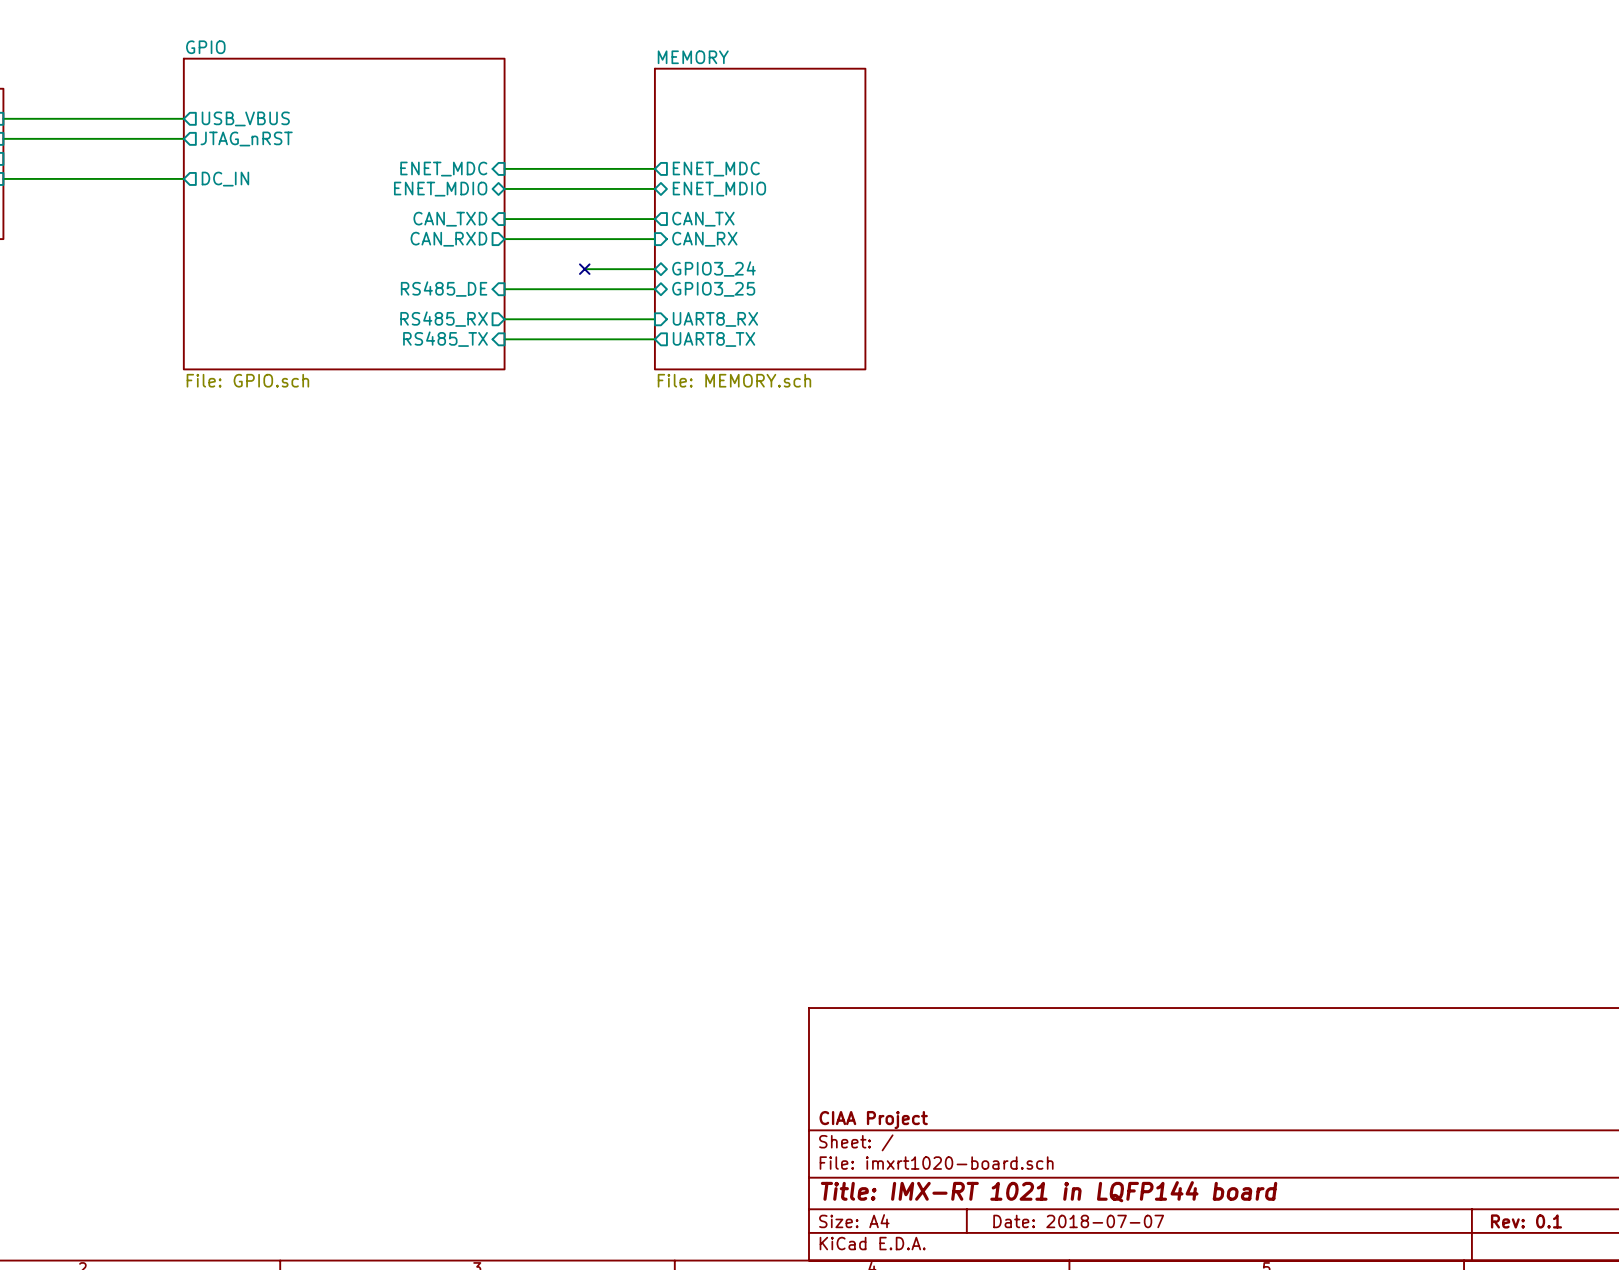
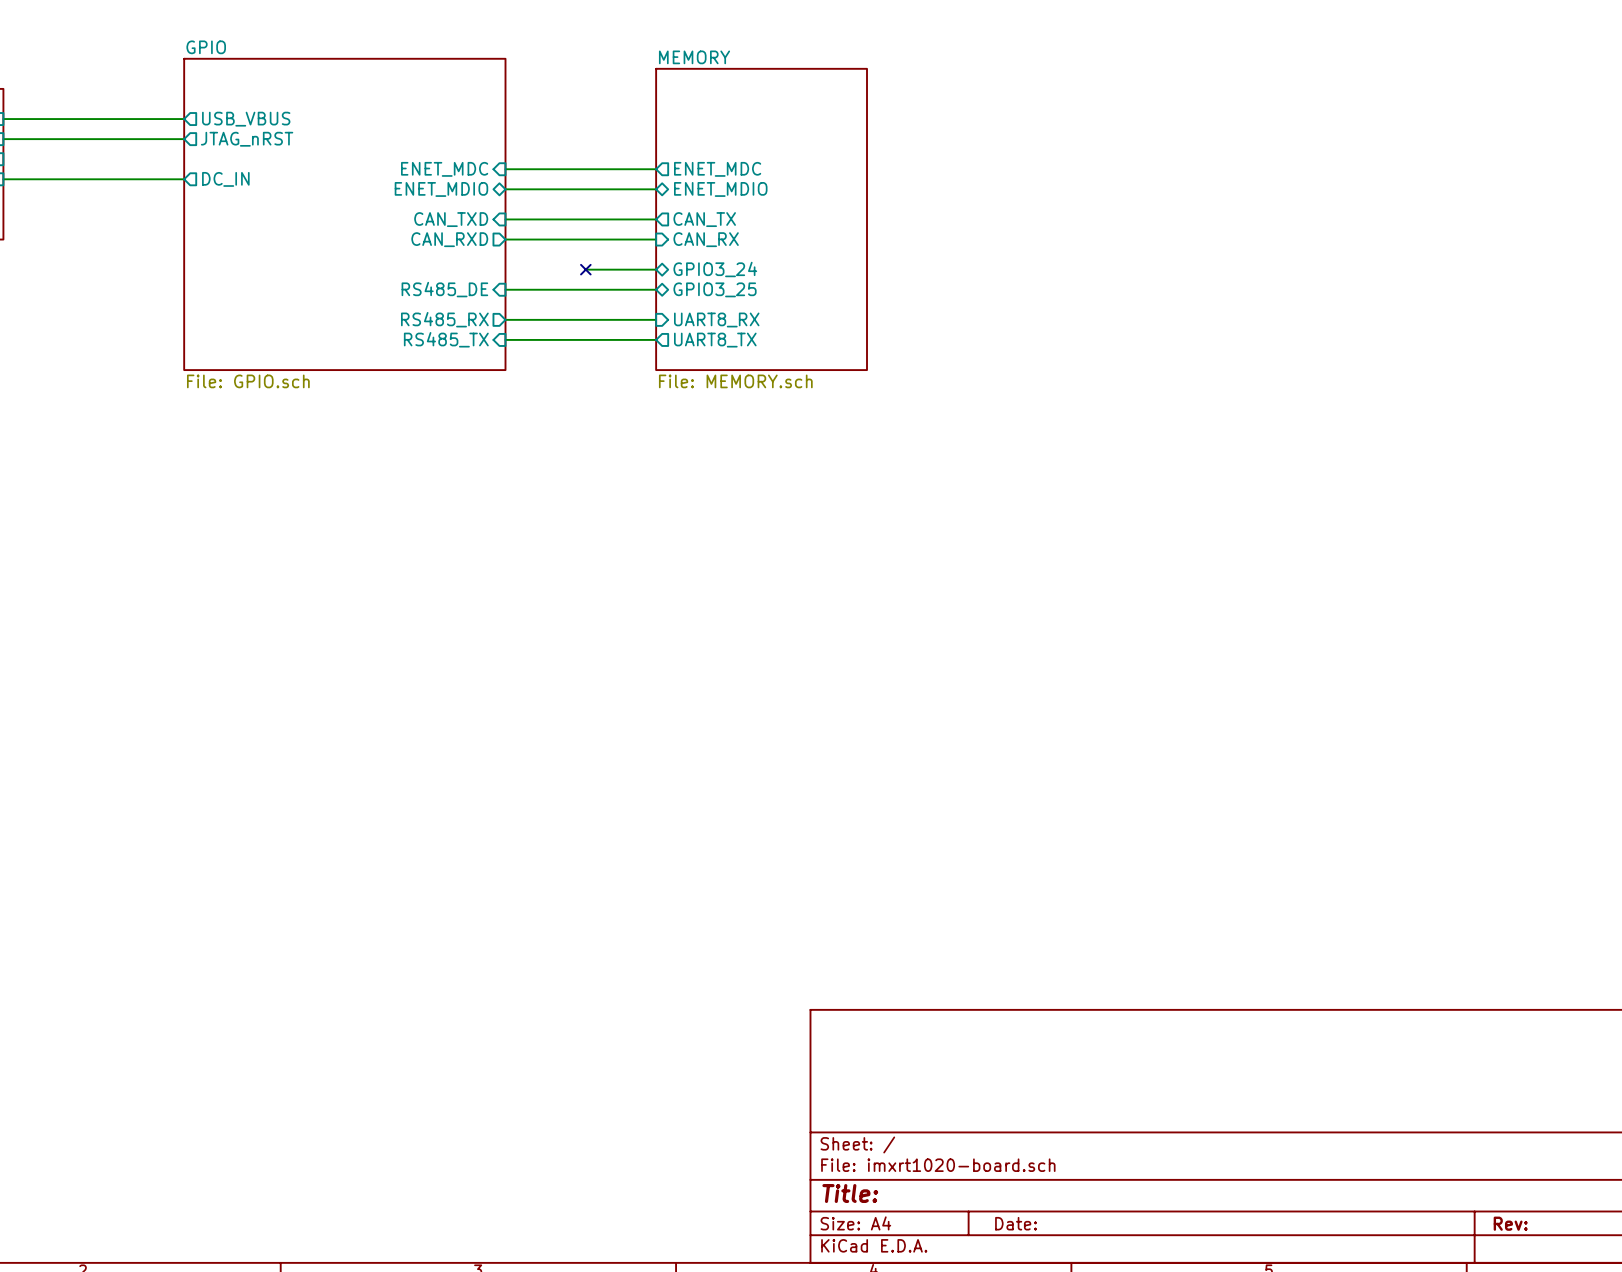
title block: CIAA Project (873, 1120) -> none
title block: Title: IMX-RT 1021 in LQFP144 board (1049, 1191) -> Title: (850, 1193)
title block: Date: 2018-07-07 (1078, 1221) -> Date: (1016, 1223)
title block: Rev: 0.1 (1526, 1221) -> Rev: (1510, 1223)

